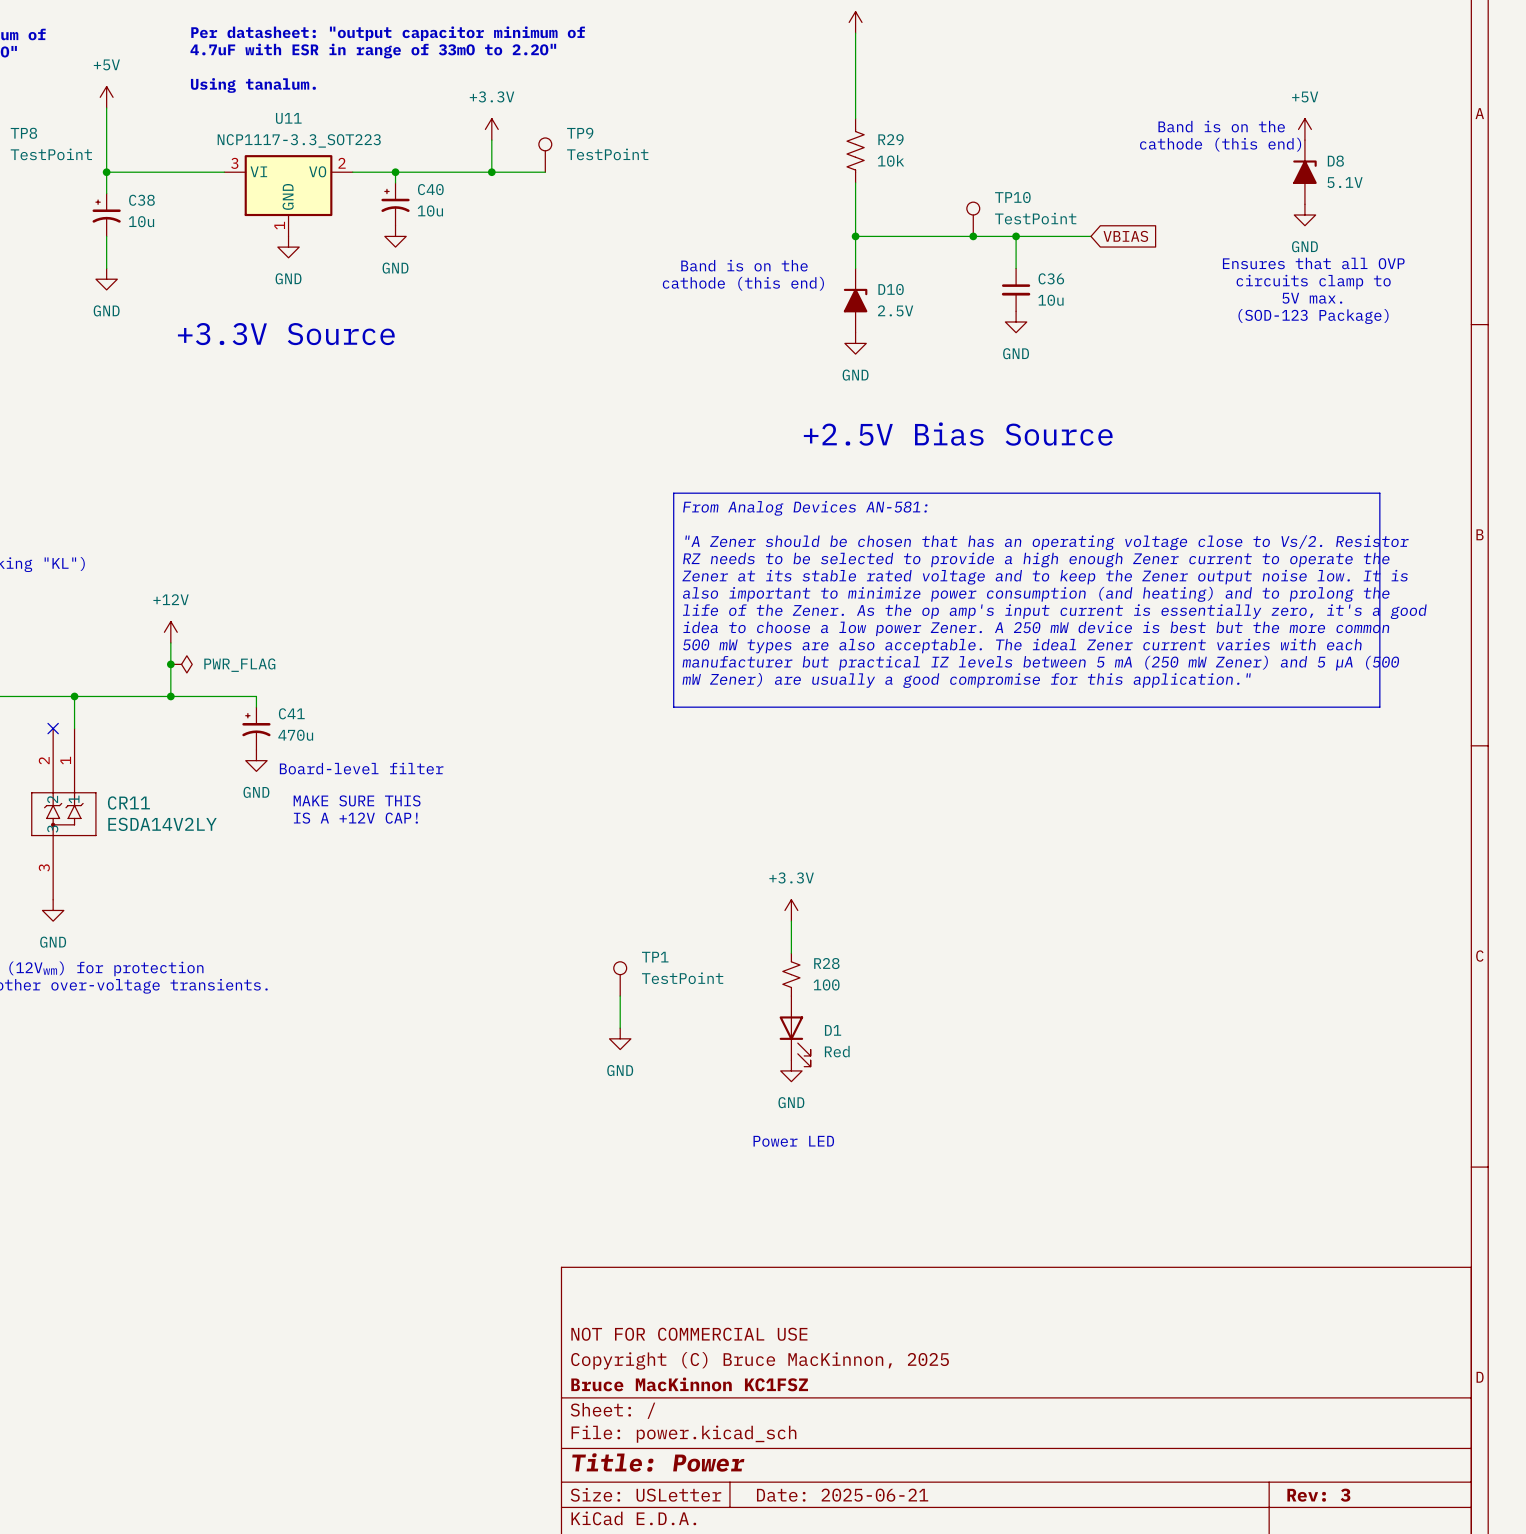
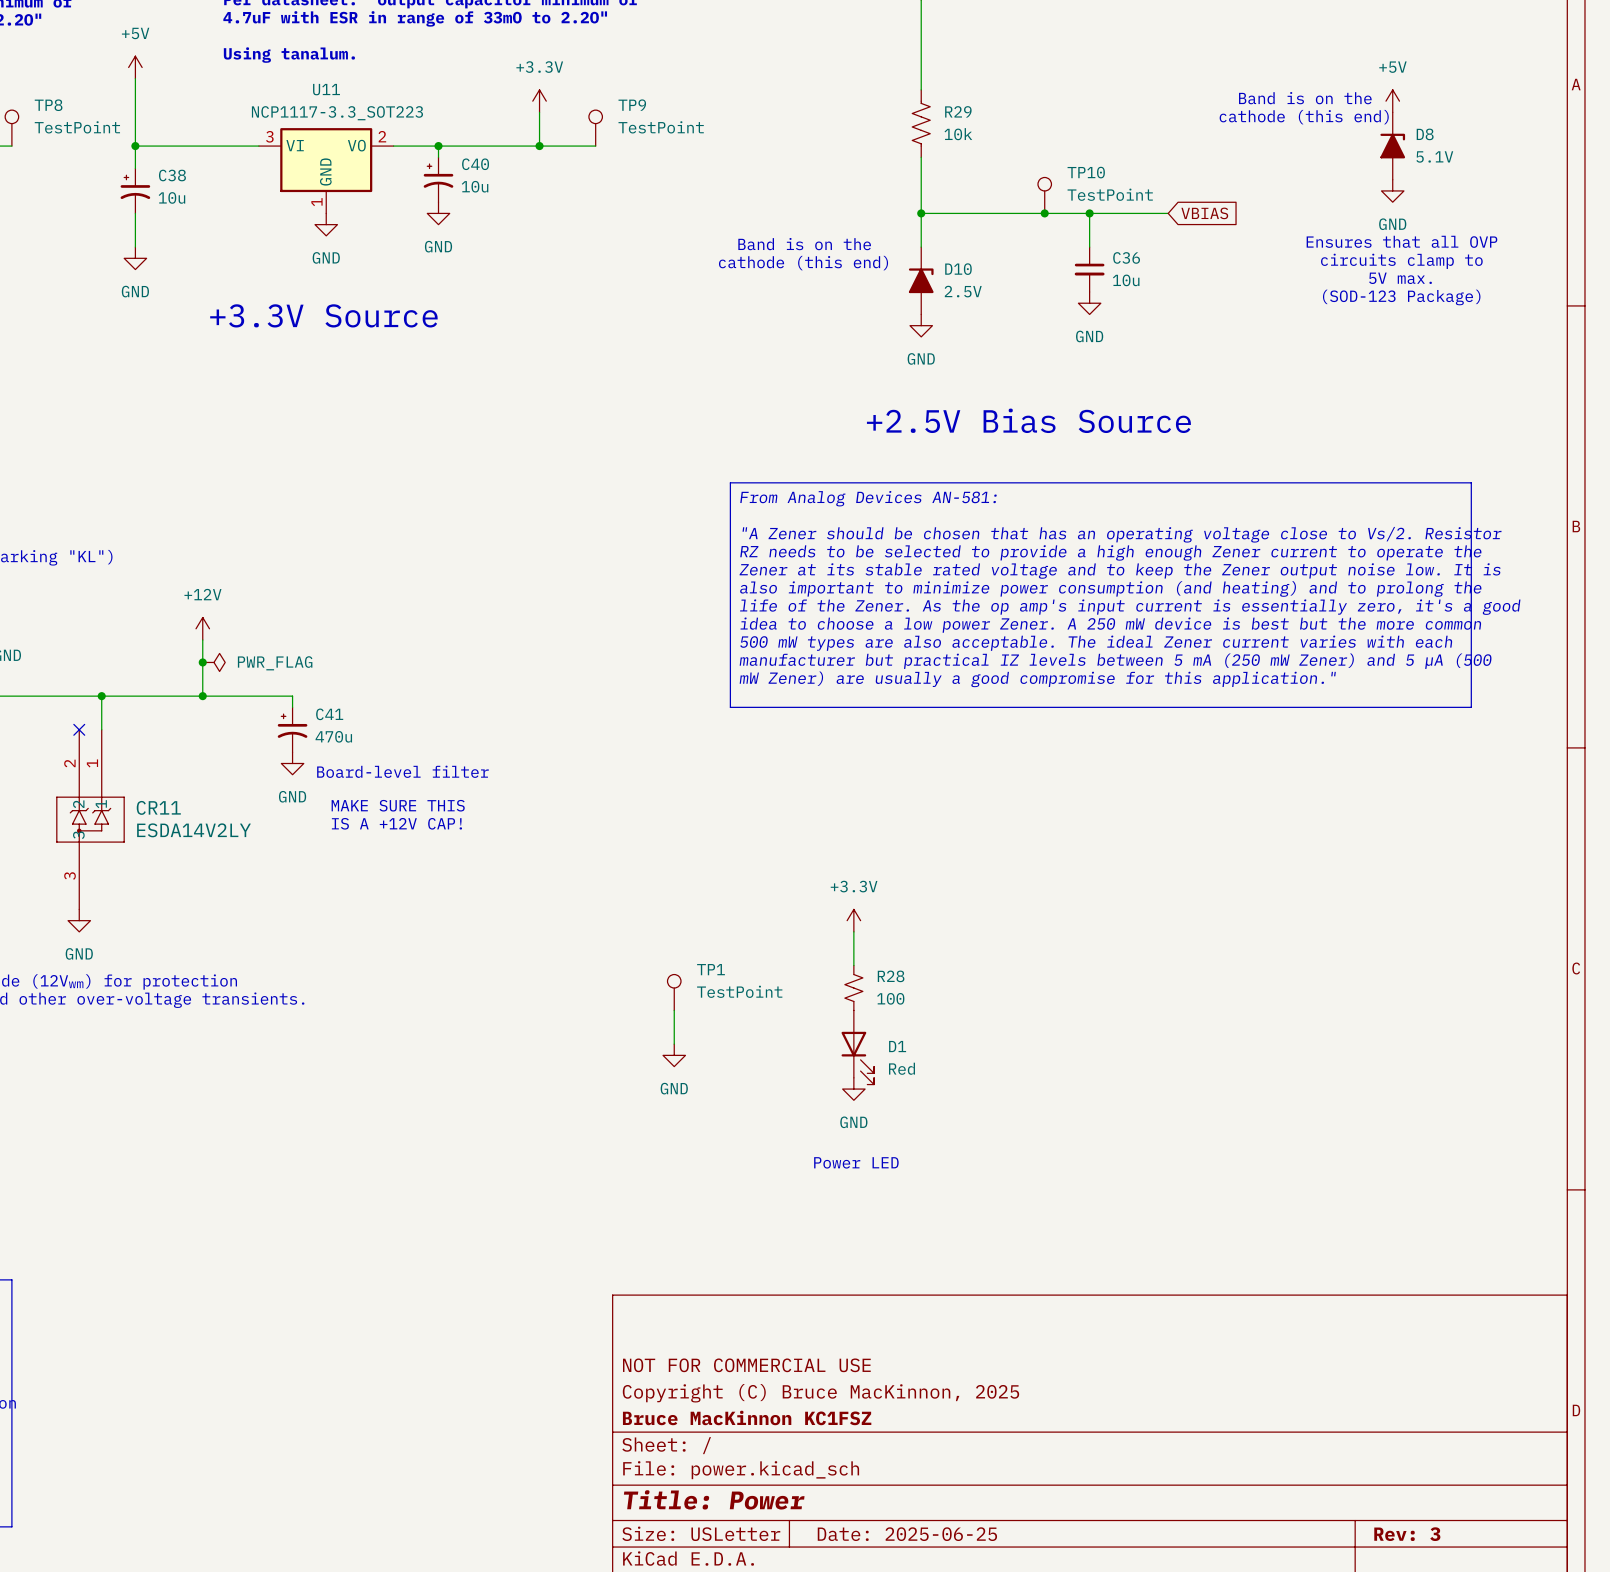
title block: Date: 2025-06-21 (842, 1495) -> Date: 2025-06-25 (907, 1534)

